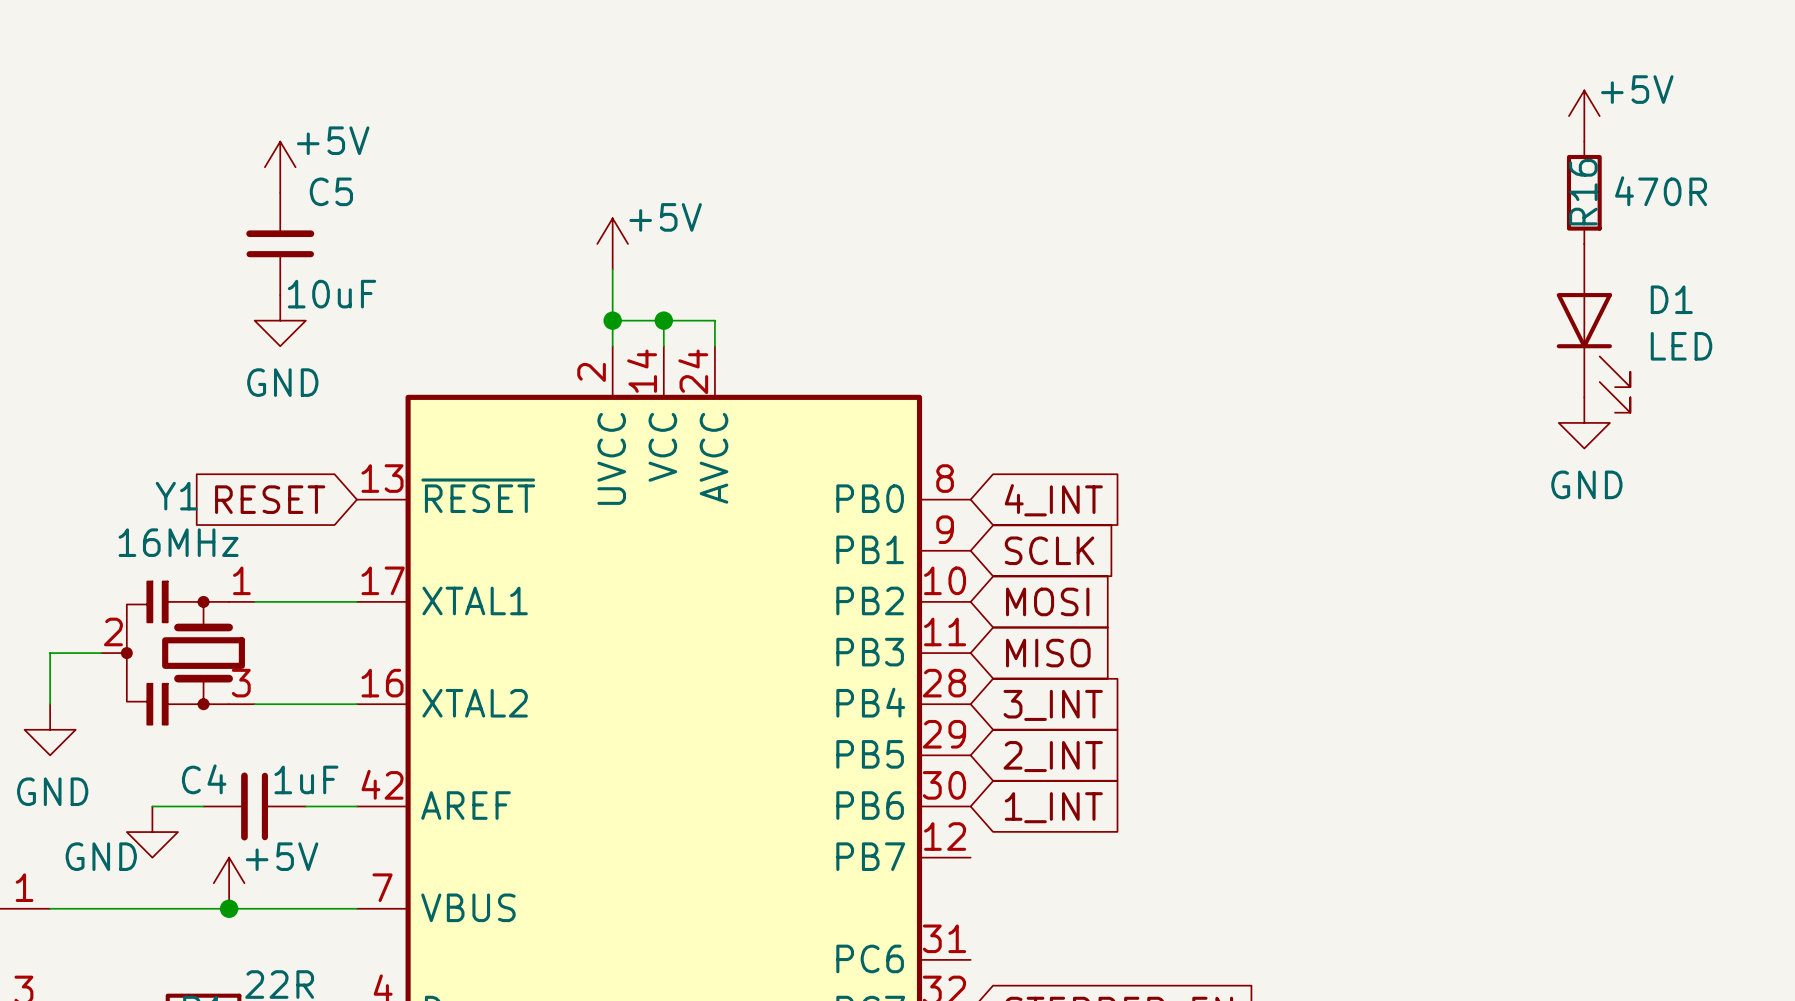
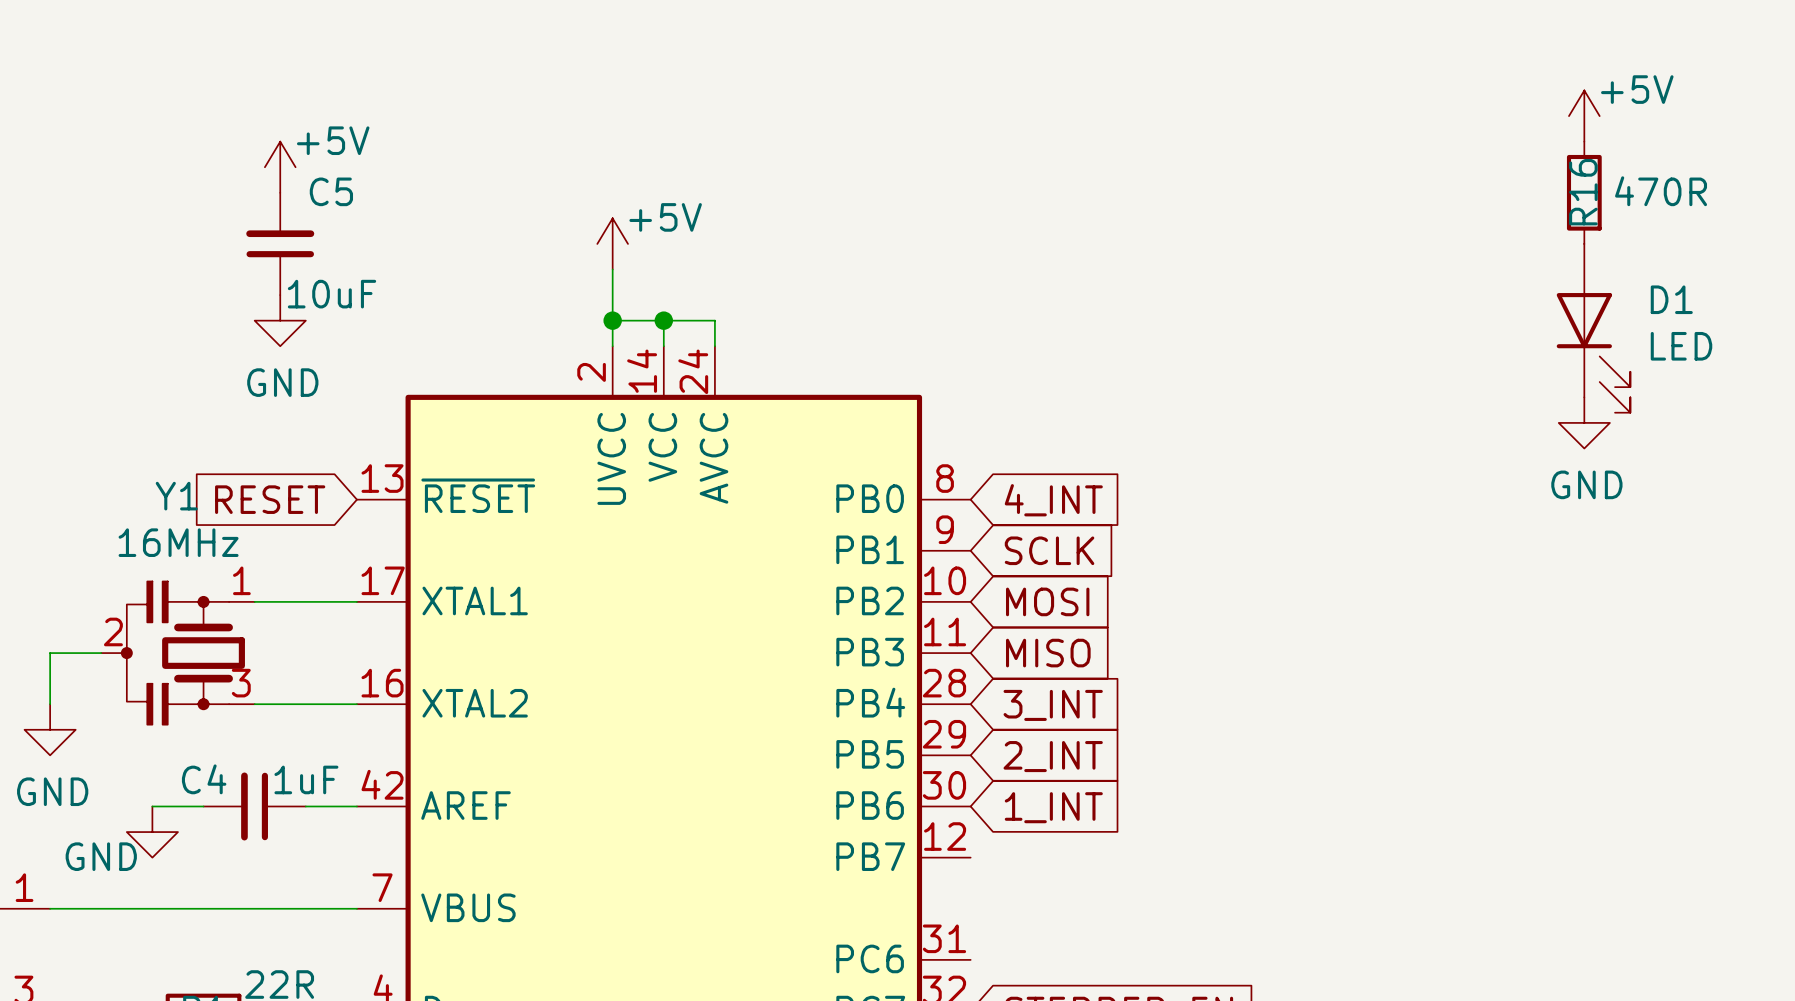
power symbol: +5V (229, 883) -> none
junction: (229, 908) -> none

